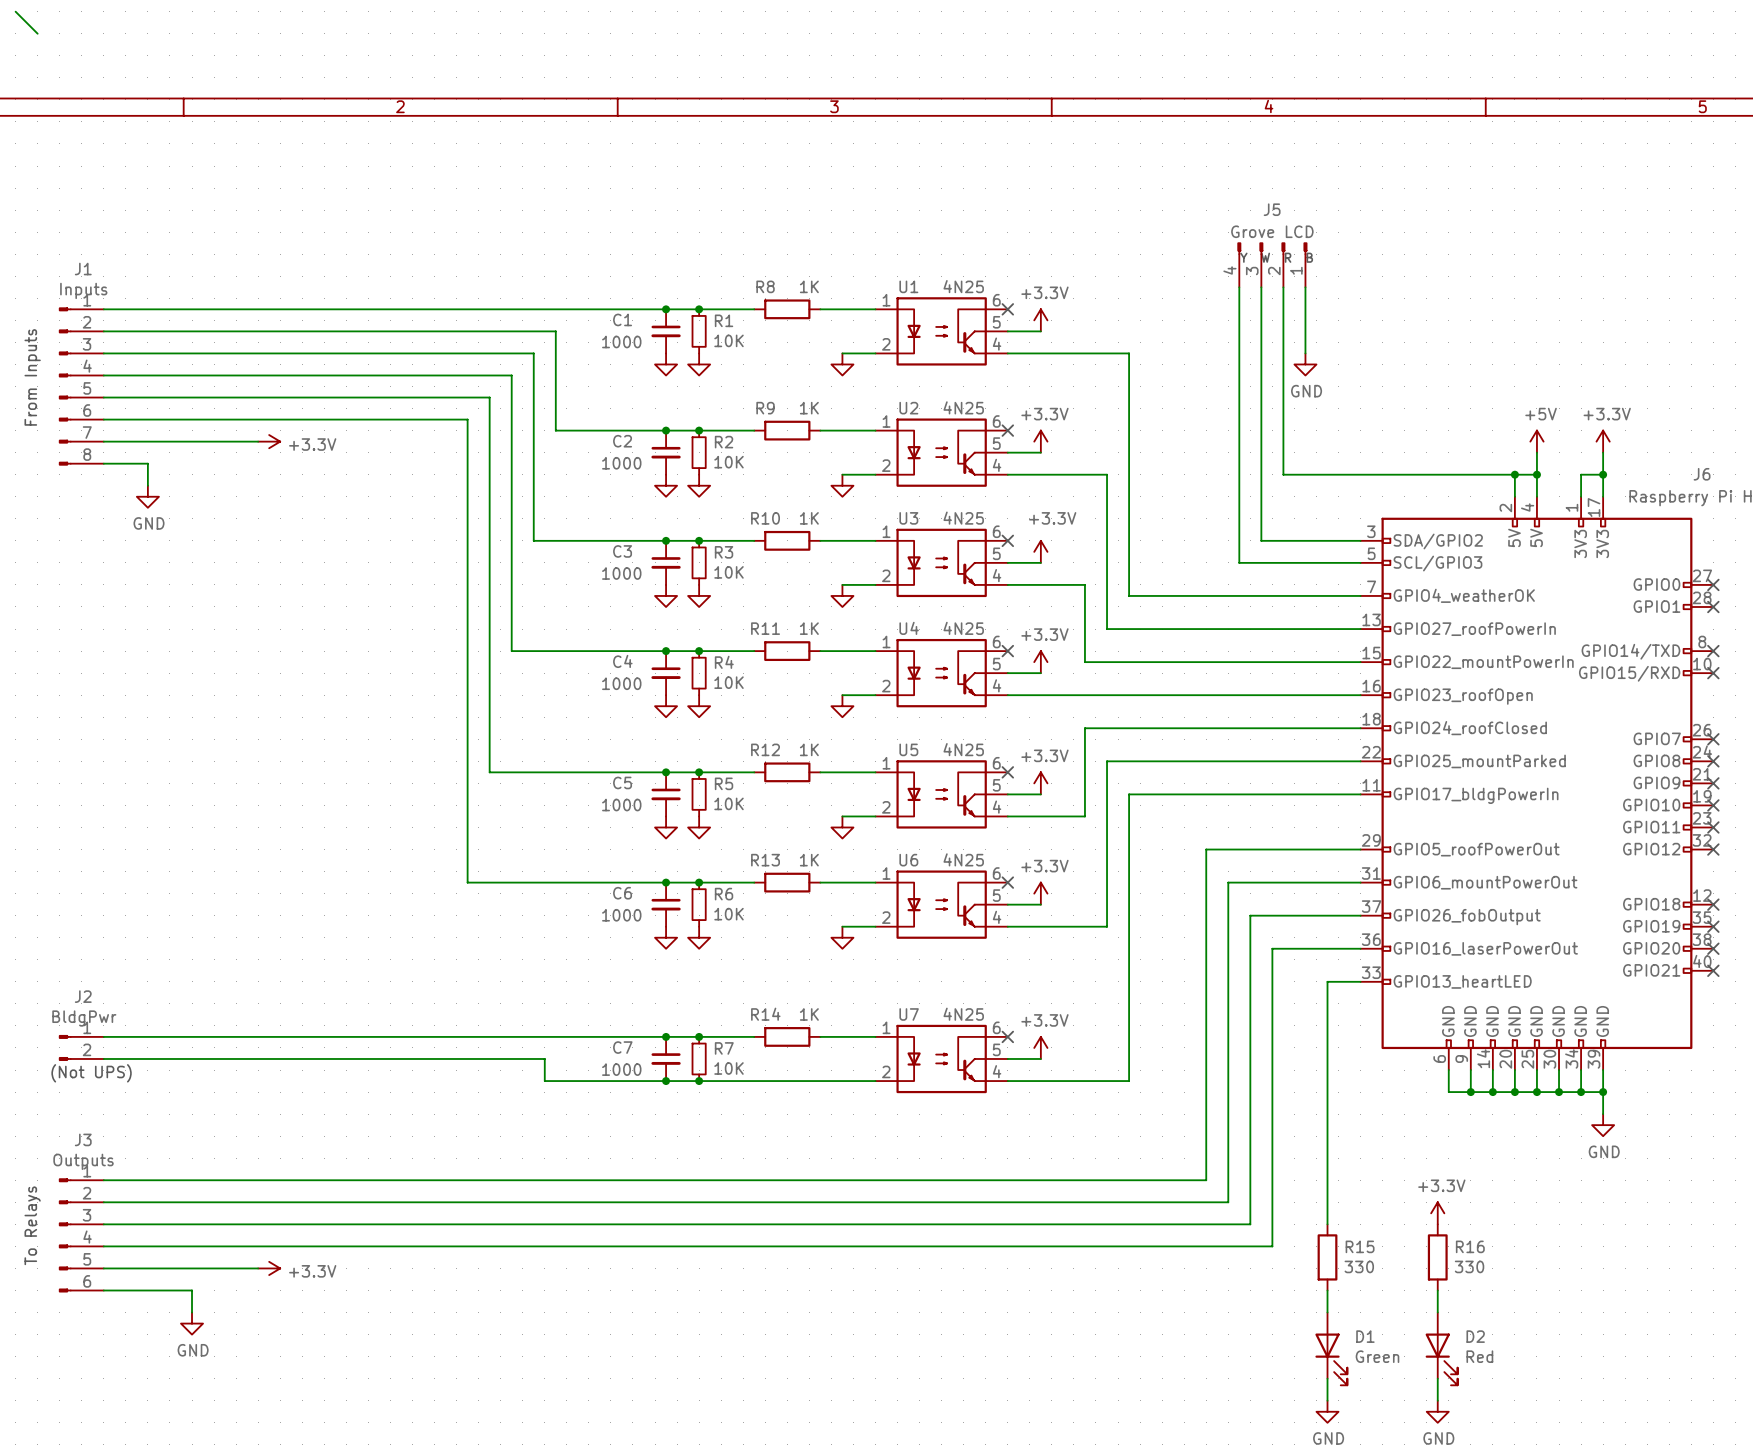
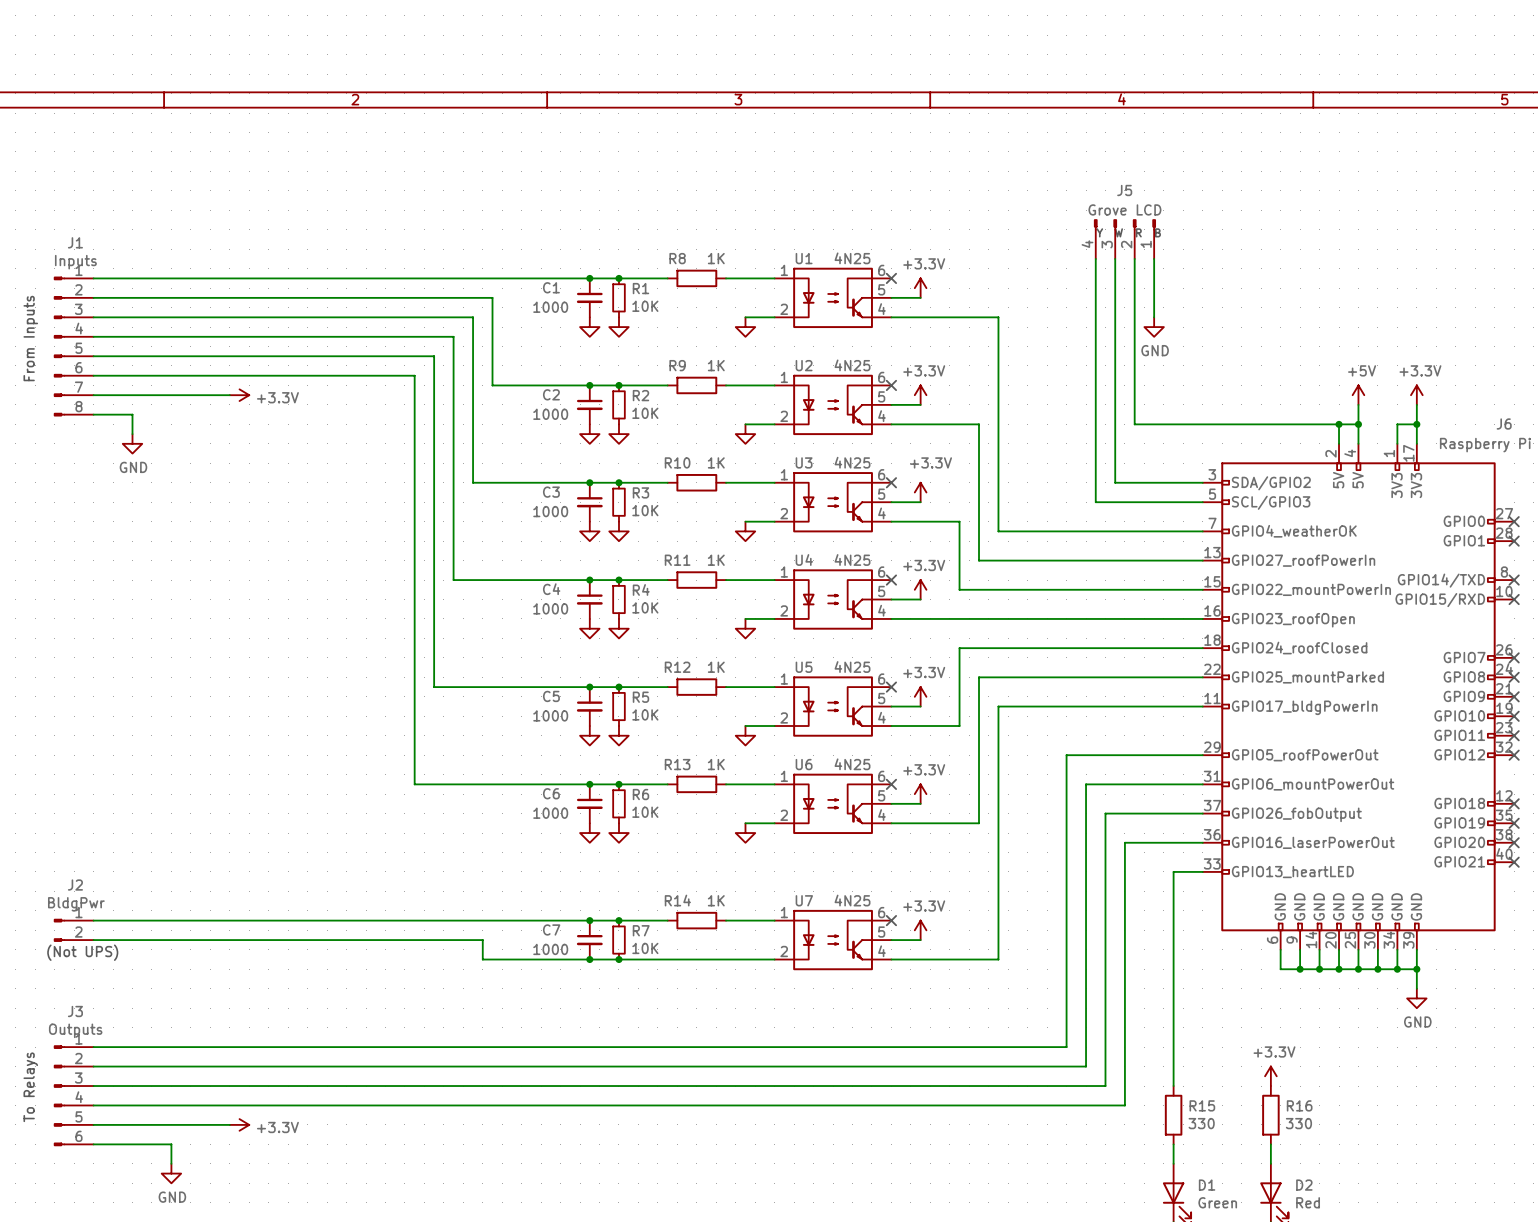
wire: (15, 11) (37, 33) -> none

